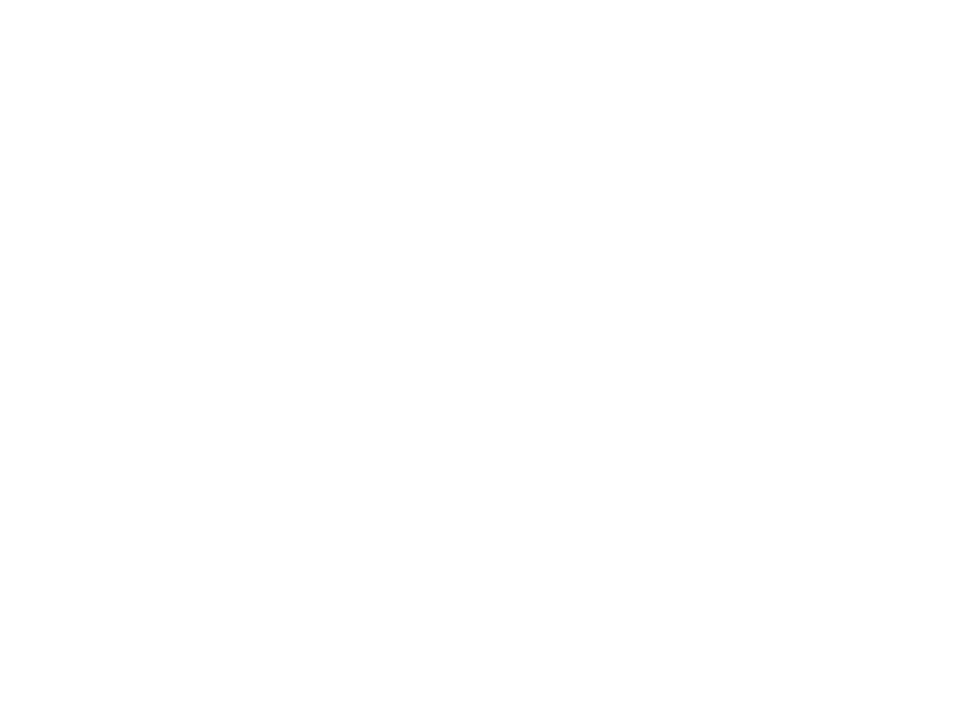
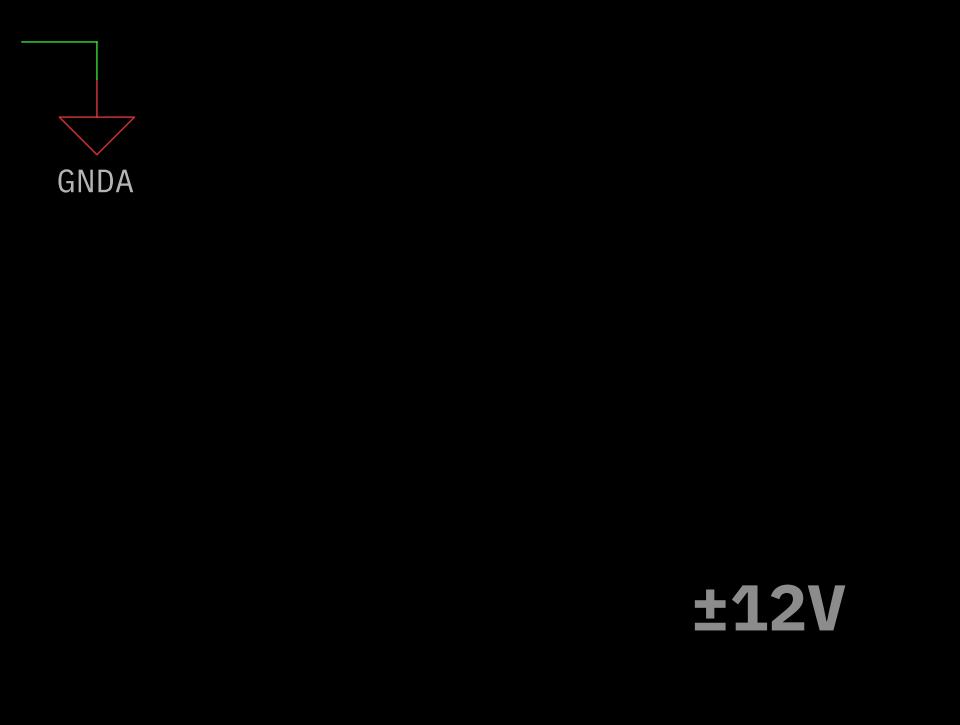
wire: none -> (21, 41) (96, 41) (96, 79)
power symbol: none -> GNDA (96, 117)
text: none -> ±12V (770, 607)

